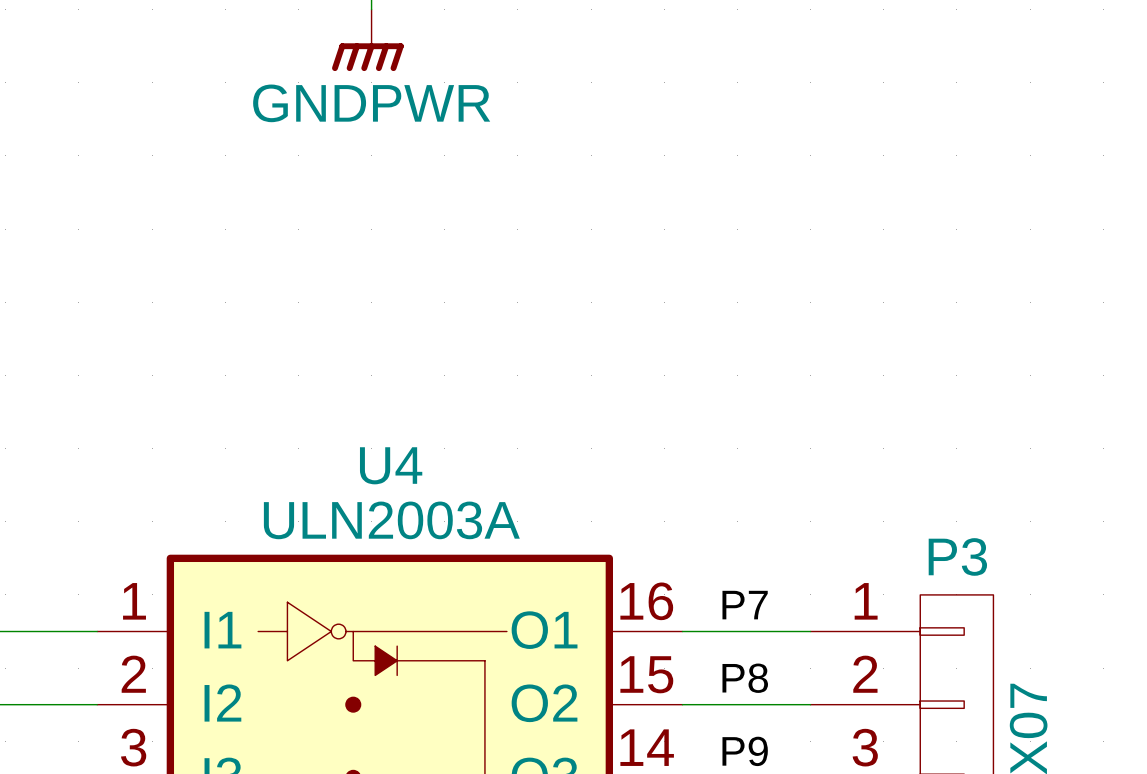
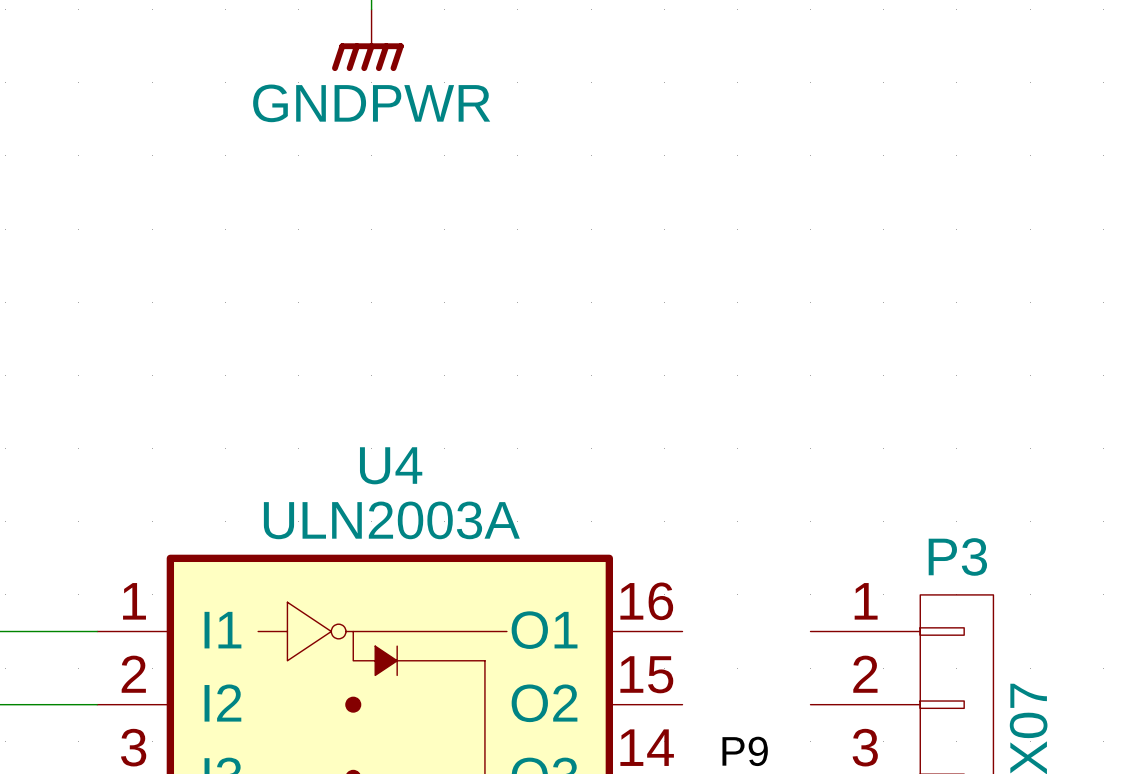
label: P7 (745, 605) -> none
wire: (682, 631) (810, 631) -> none
label: P8 (745, 678) -> none
wire: (682, 704) (810, 704) -> none

